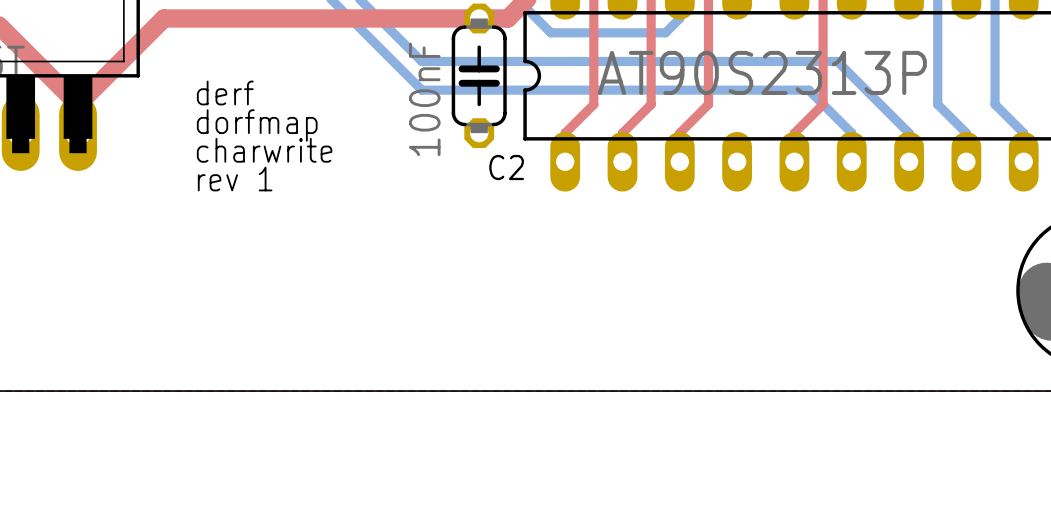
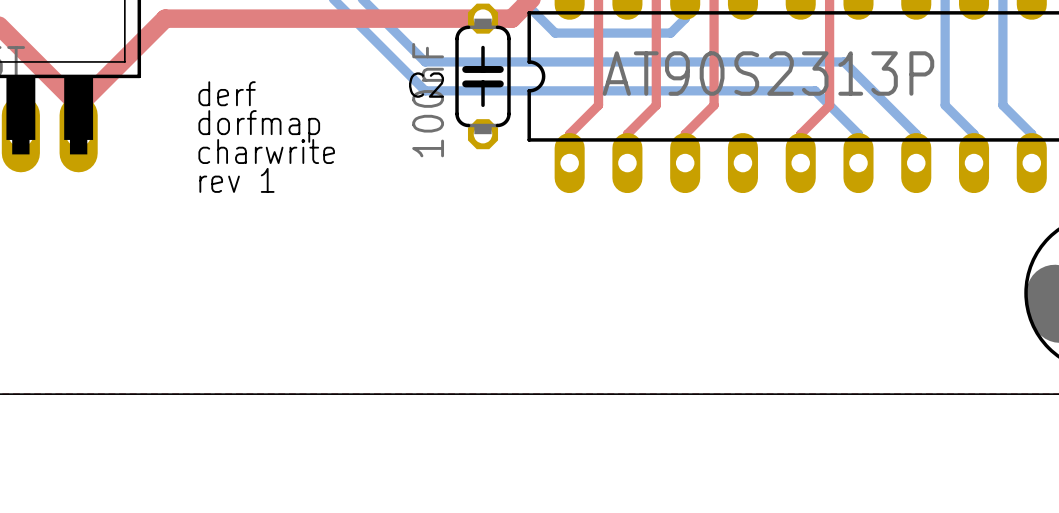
C2 name position: C2 (506, 167) -> C2 (426, 85)

